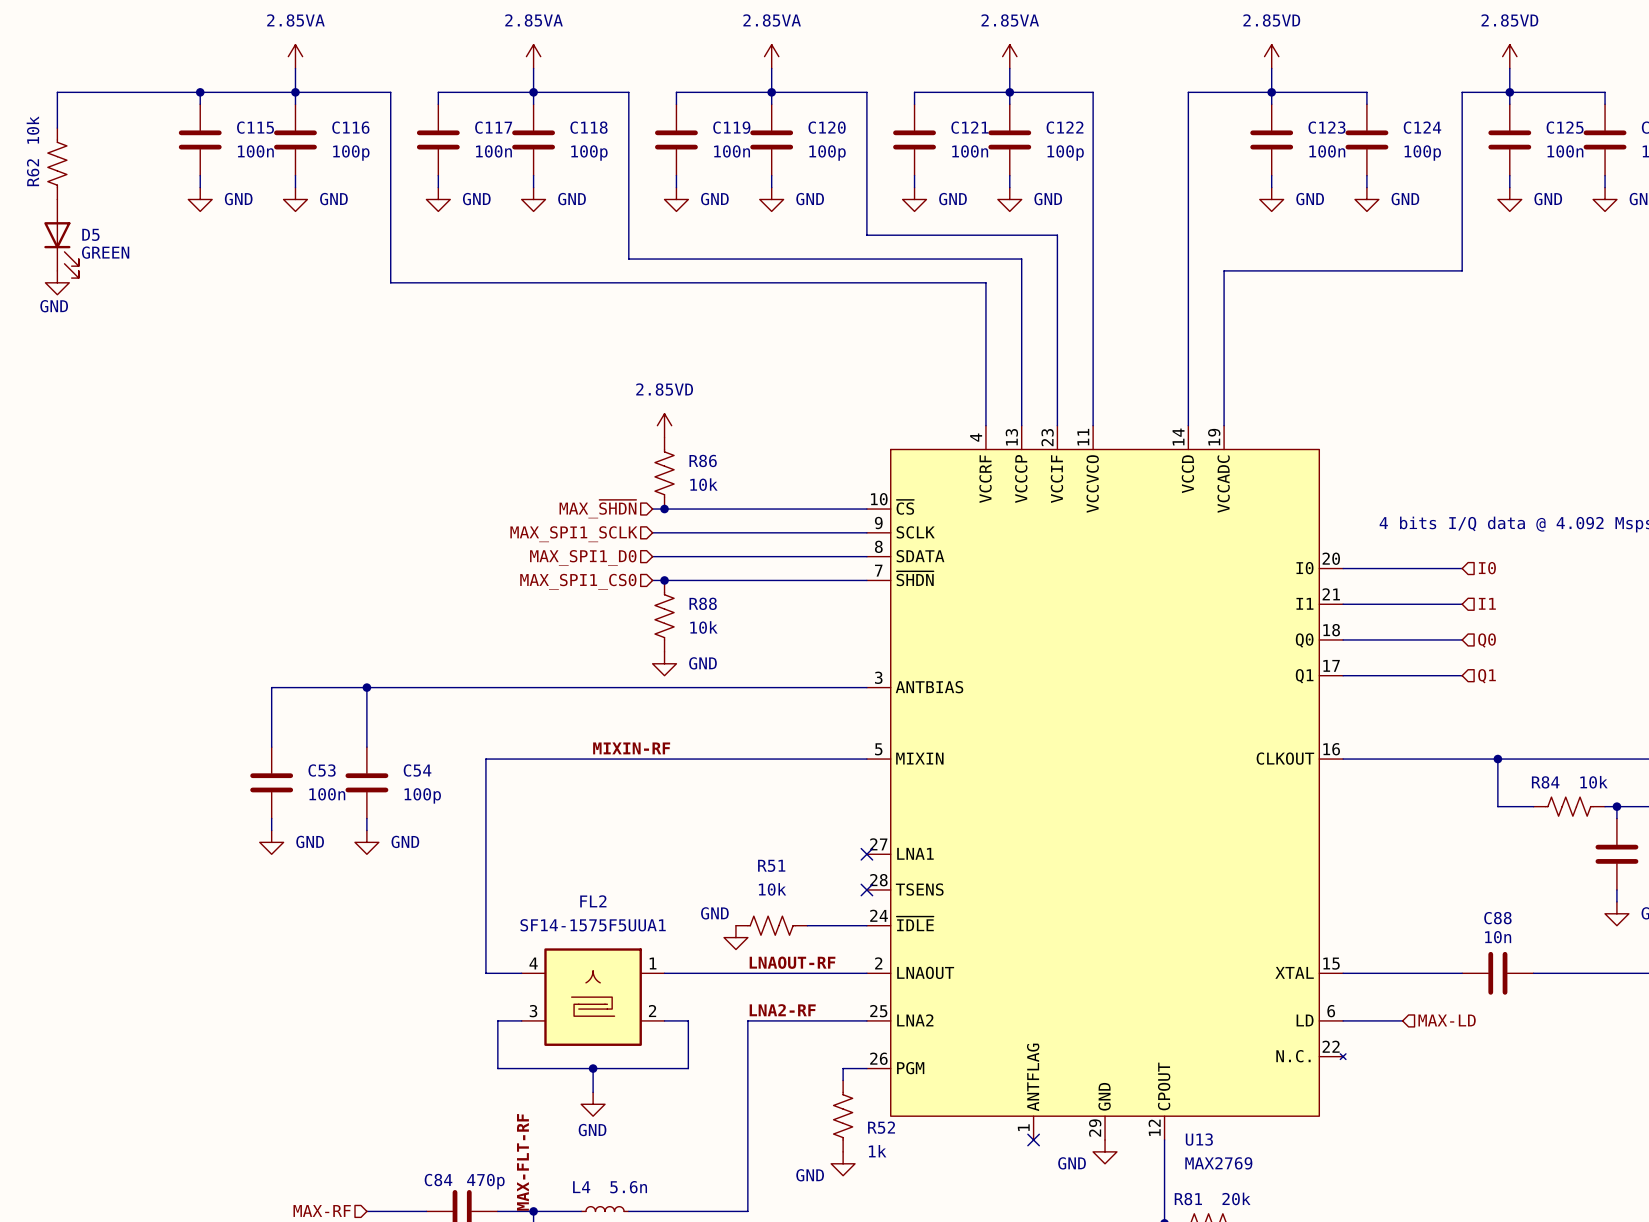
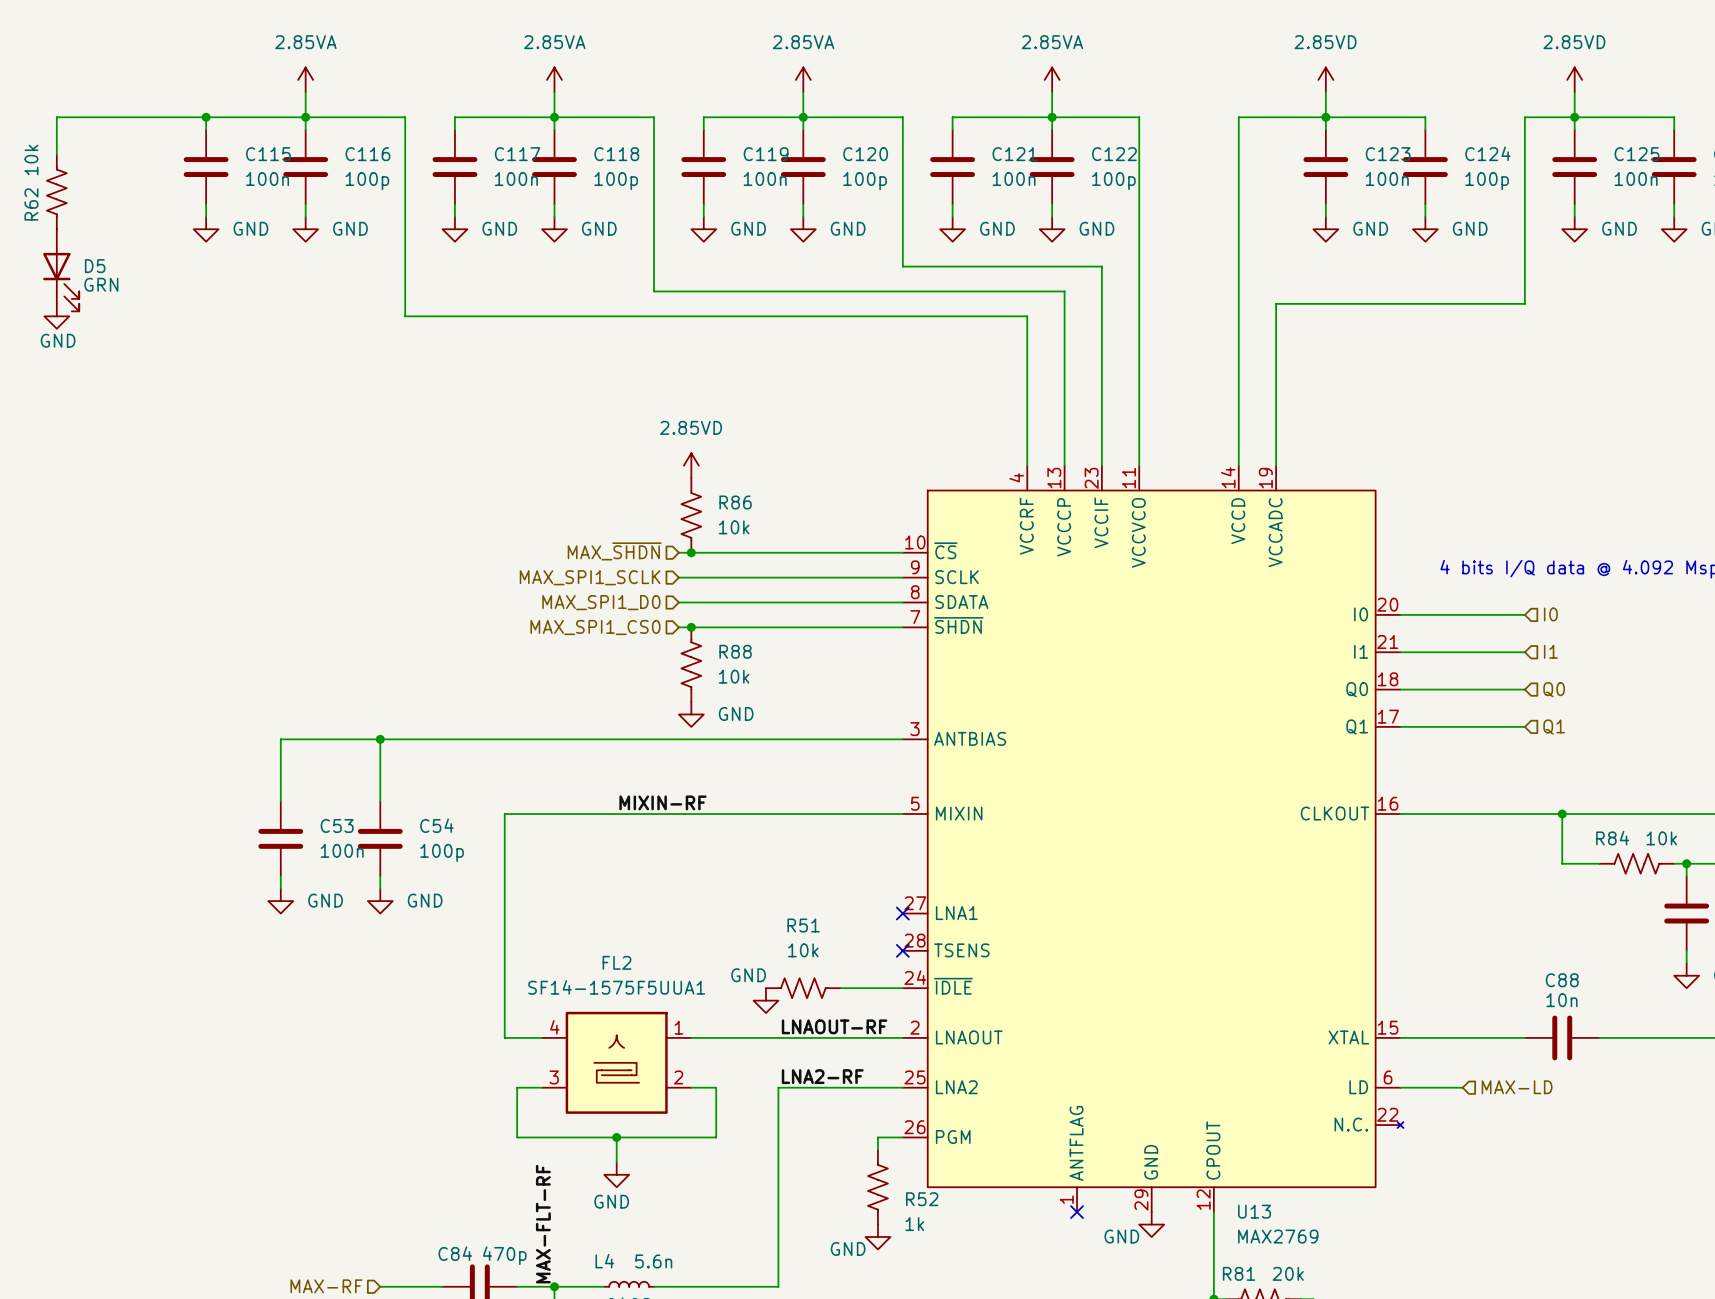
D5 value: GREEN (105, 252) -> GRN (101, 284)

